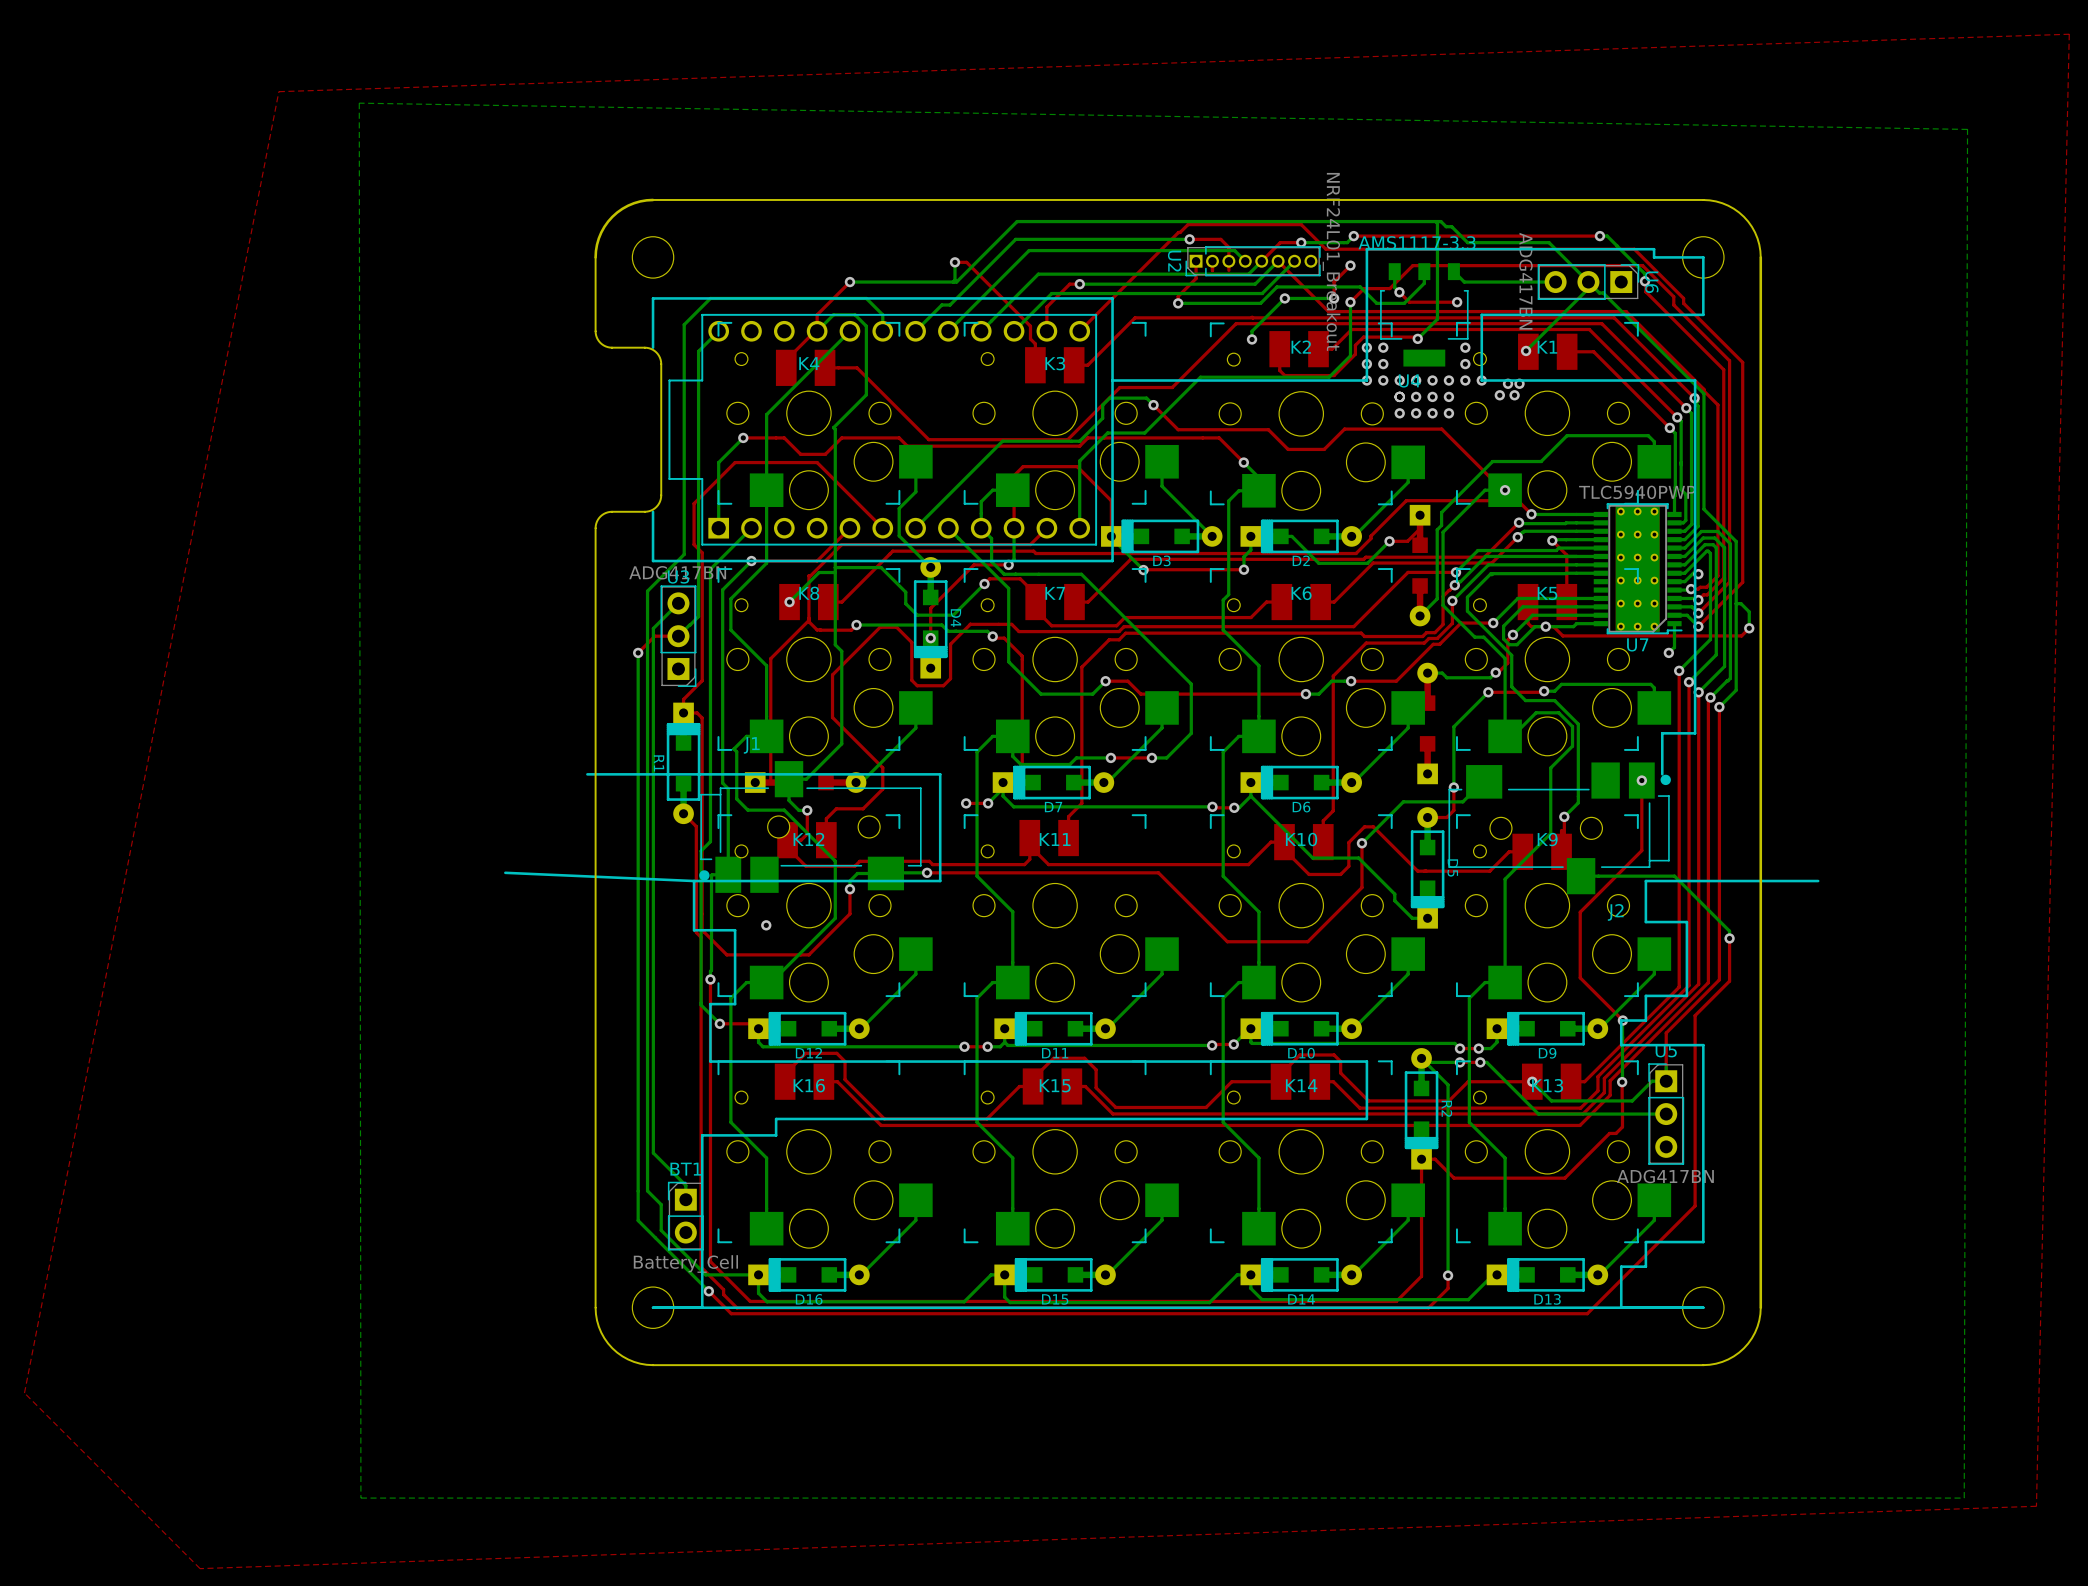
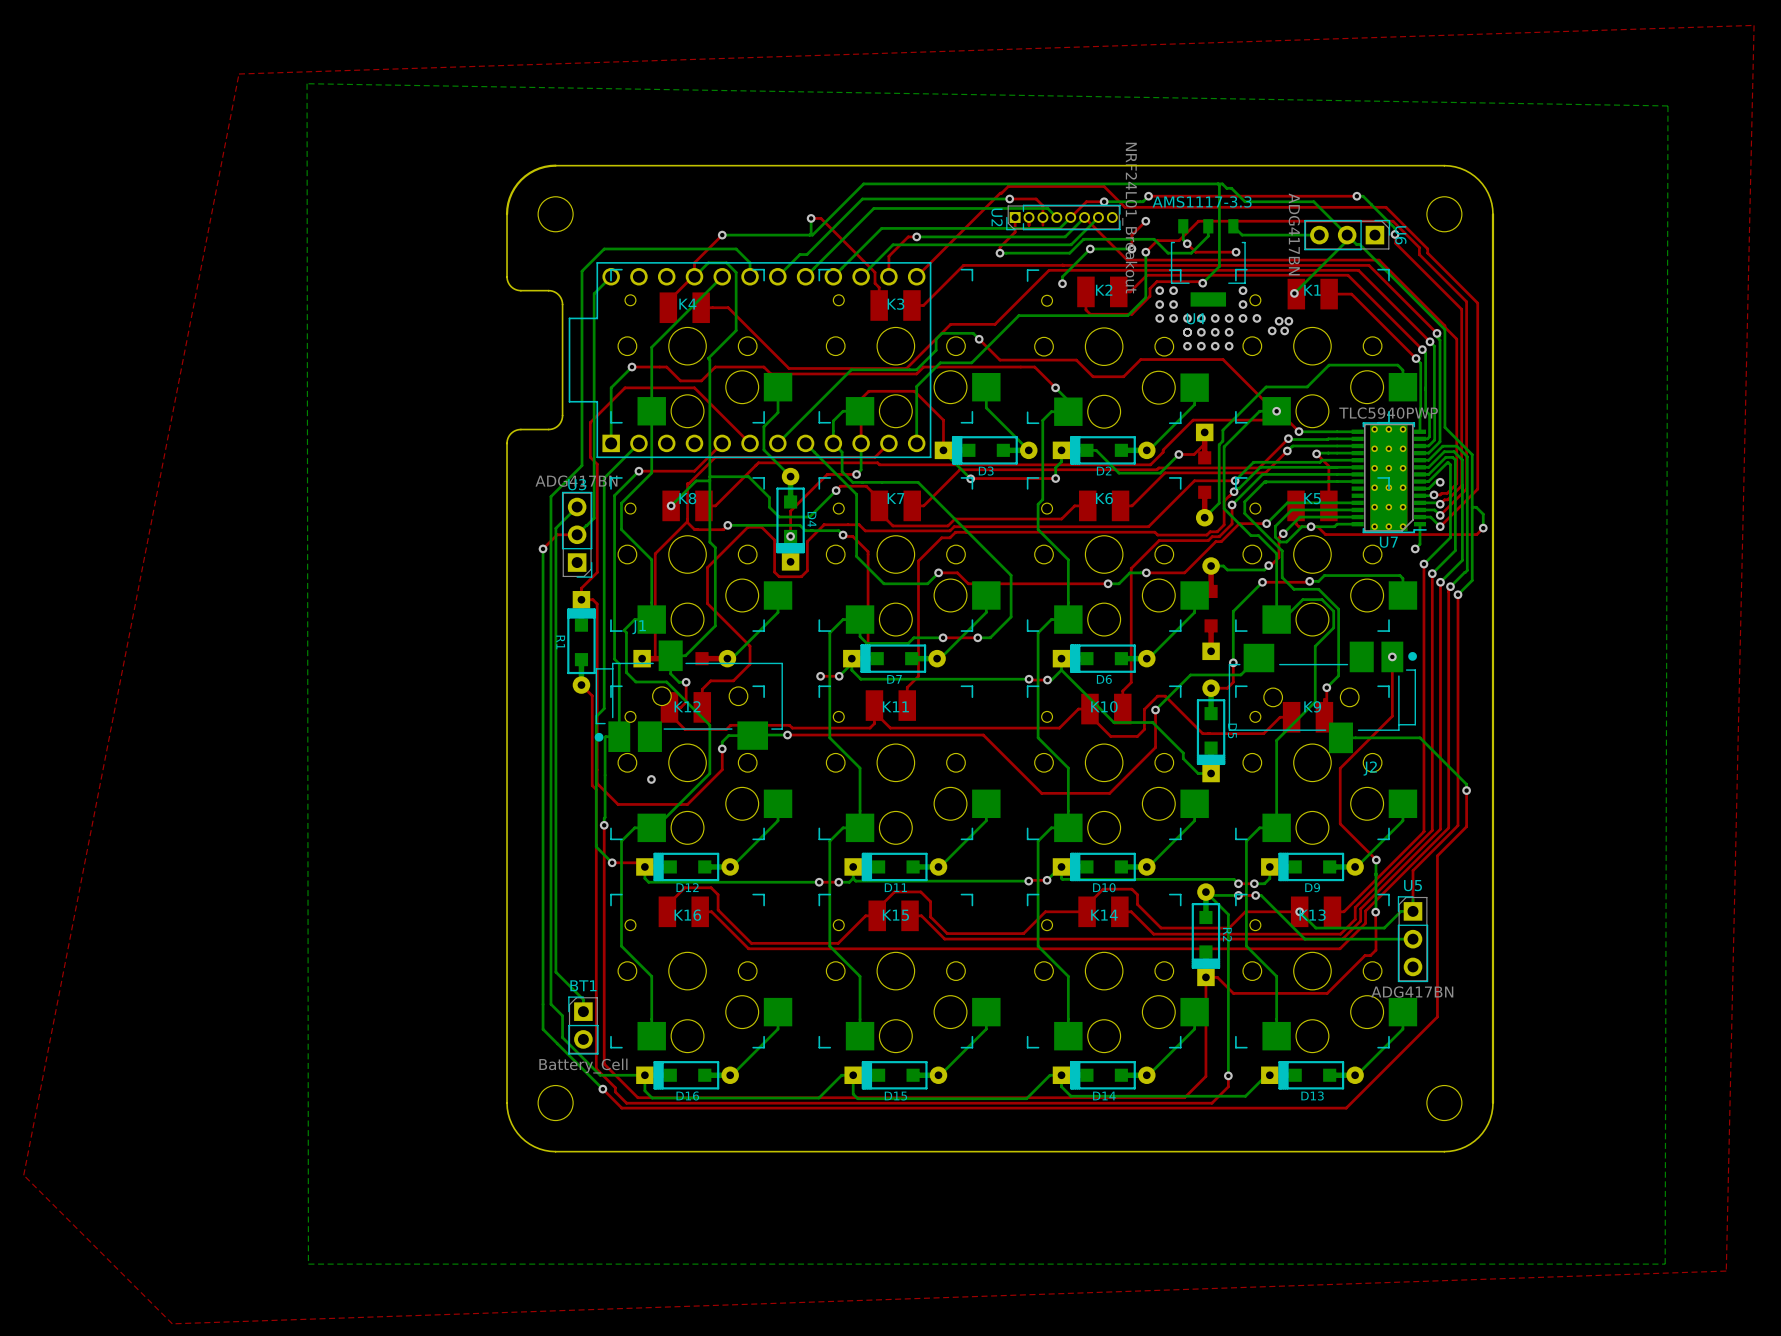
line: (653, 347) (653, 298) (1112, 298) (1112, 561) (653, 561) (653, 511) -> none
line: (1112, 380) (1366, 380) (1366, 249) (1654, 249) (1654, 257) (1703, 257) (1703, 314) (1481, 314) (1481, 380) (1695, 380) (1695, 733) (1662, 733) (1662, 774) -> none
line: (587, 774) (940, 774) (940, 881) (694, 881) -> none
line: (505, 872) (694, 881) -> none
line: (694, 881) (694, 930) (735, 930) (735, 1004) (710, 1004) (710, 1061) (1366, 1061) (1366, 1118) (776, 1118) (776, 1135) (702, 1135) (702, 1307) -> none
line: (1818, 881) (1645, 881) (1645, 922) (1686, 922) (1686, 995) (1645, 995) (1645, 1020) (1621, 1020) (1621, 1045) (1703, 1045) (1703, 1242) (1645, 1242) (1645, 1266) (1621, 1266) (1621, 1307) -> none
line: (1703, 1307) (653, 1307) -> none

